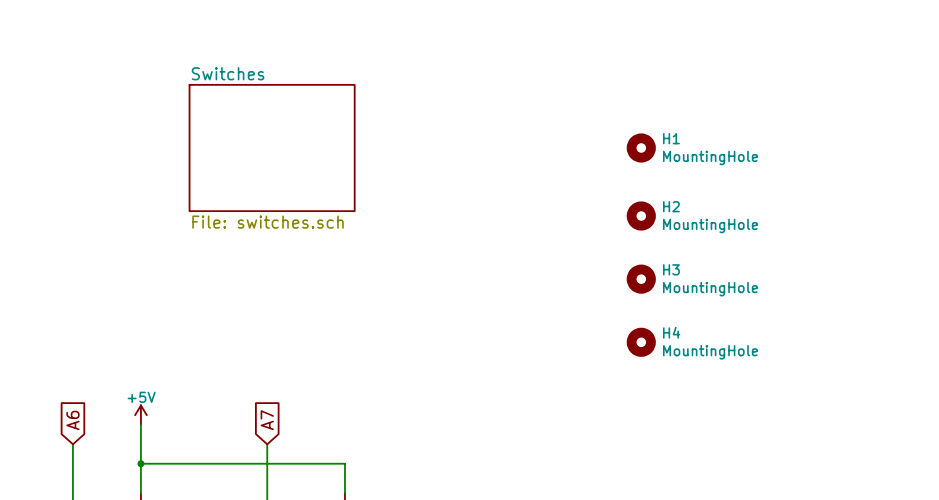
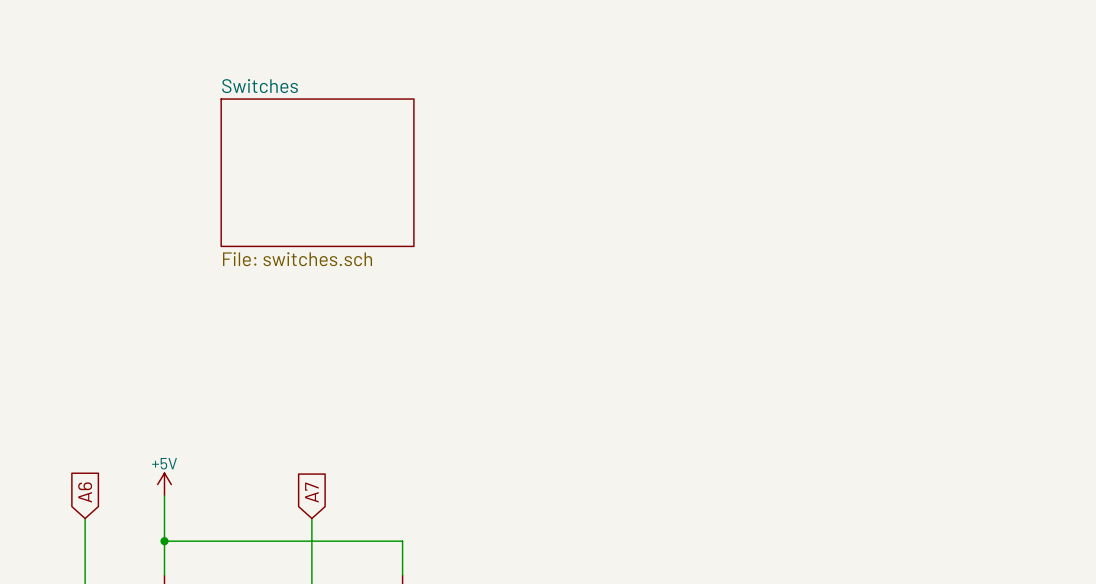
H1: MountingHole (641, 148) -> none
H2: MountingHole (641, 216) -> none
H3: MountingHole (641, 279) -> none
H4: MountingHole (641, 342) -> none

